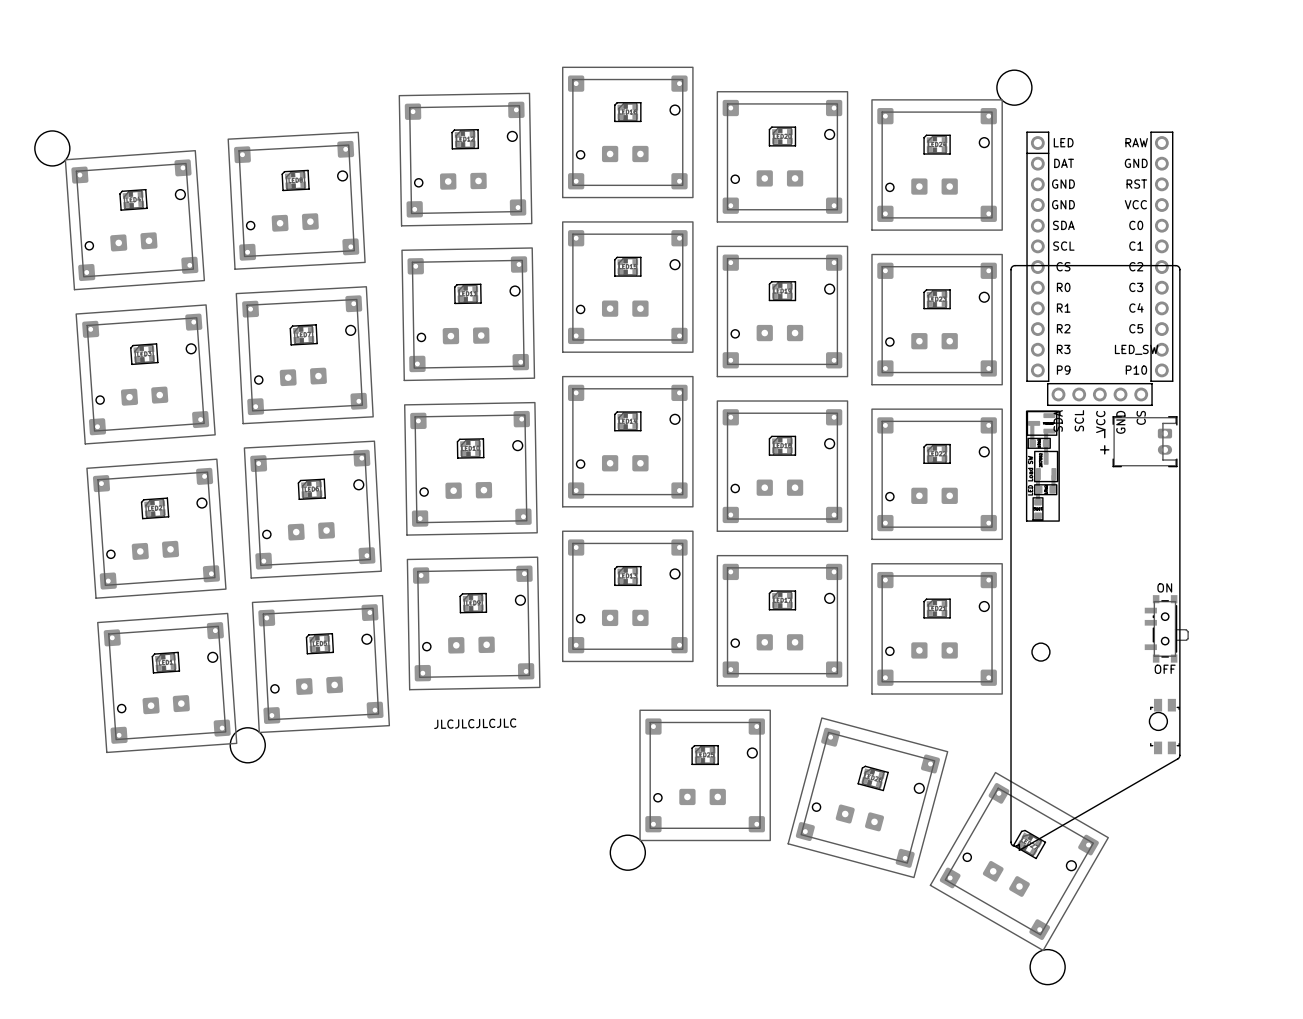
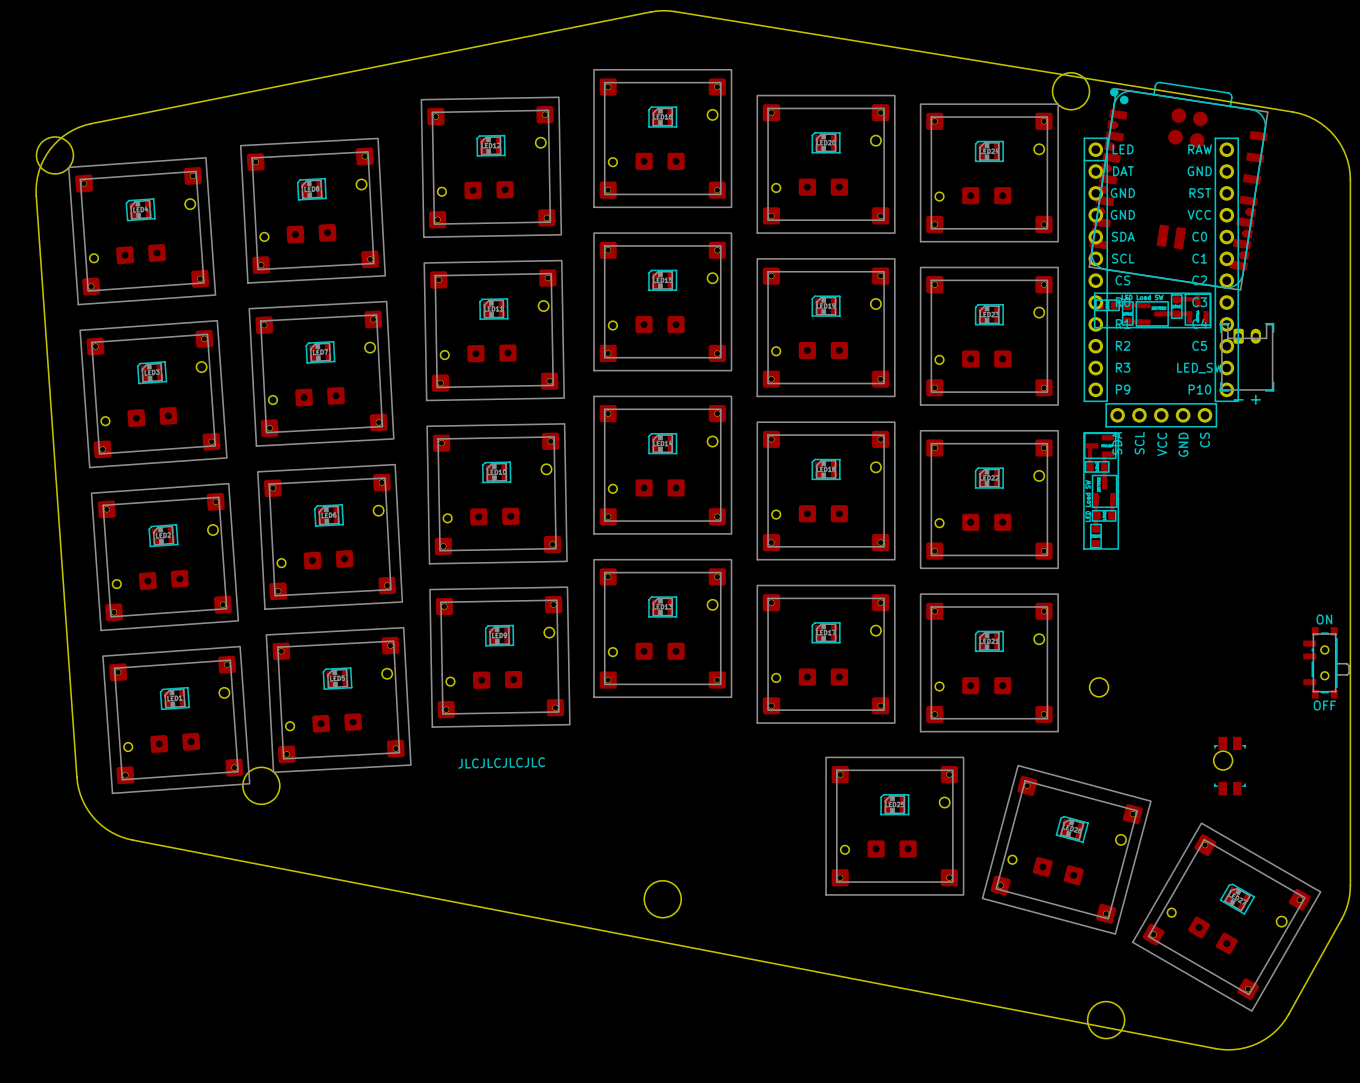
board edge: none -> (675, 11) (1292, 111) (1310, 117) (1320, 123) (1334, 135) (1341, 145) (1348, 161) (1350, 179) (1350, 891) (1344, 913) (1288, 1014) (1277, 1029) (1263, 1040) (1240, 1048) (1215, 1048) (132, 840) (116, 834) (102, 825) (84, 804) (76, 777) (36, 195) (38, 171) (50, 149) (68, 132) (91, 123) (650, 12) (675, 11)
part: none -> (1178, 186)
board edge: (1015, 265) (1175, 265) (1179, 269) (1179, 756) (1019, 850) (1019, 844) (1014, 846) (1011, 842) (1011, 269) (1015, 265) -> none
part: none -> (1152, 310)
part rotation: 0° (1138, 441) -> 90° counterclockwise (1247, 363)
part position: (1138, 441) -> (1247, 363)
part position: (1166, 628) -> (1326, 662)
part position: (705, 755) -> (894, 804)
part position: (705, 775) -> (894, 826)
part position: (873, 778) -> (1072, 829)
part position: (867, 797) -> (1066, 849)
part position: (1029, 844) -> (1237, 899)
part position: (1019, 861) -> (1226, 917)

